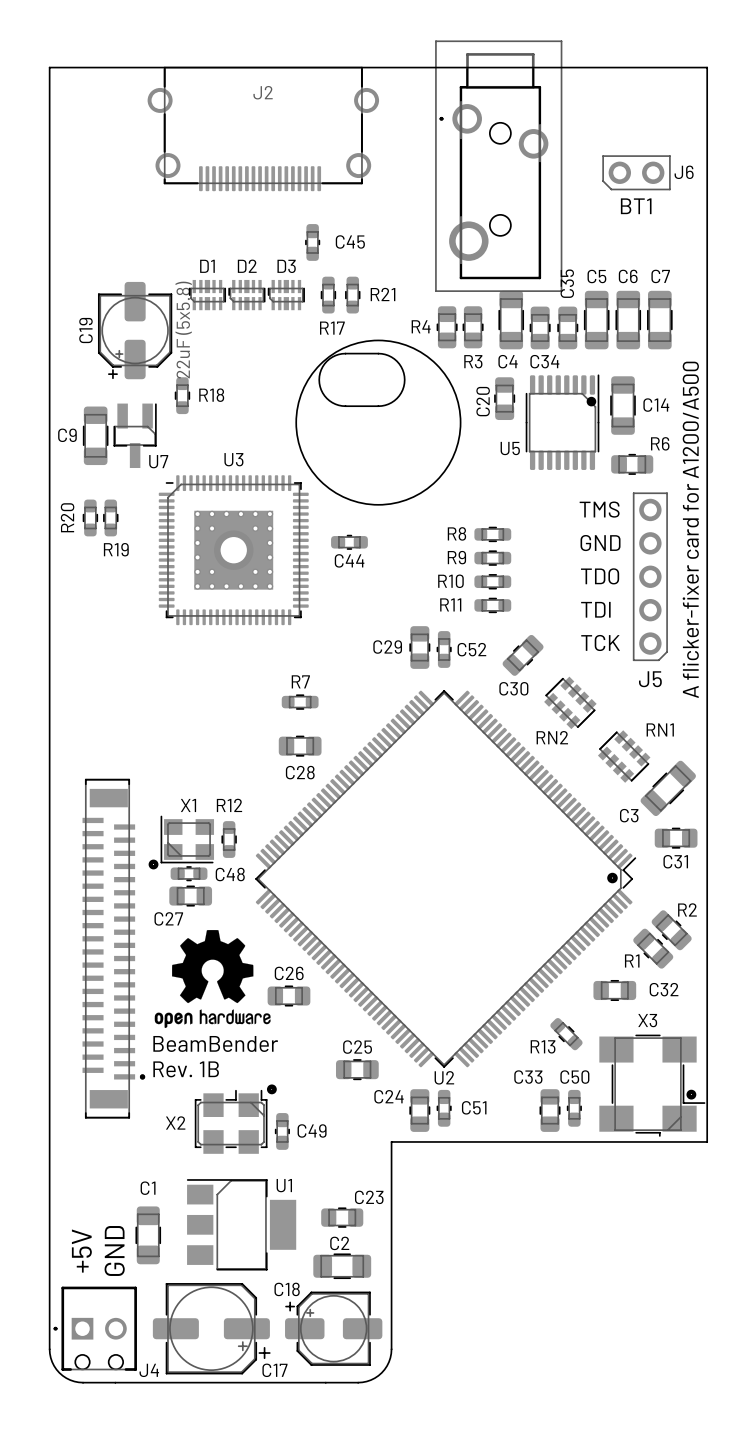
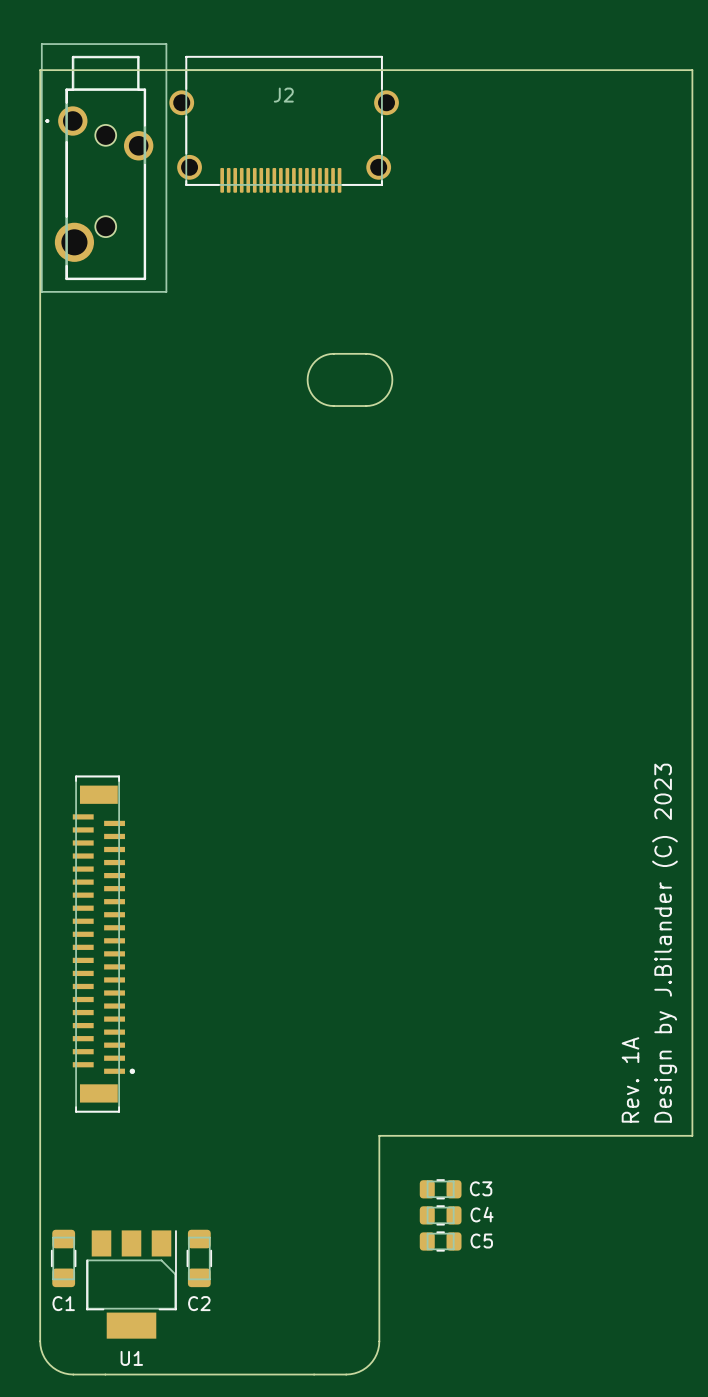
J2 footprint: [147, 67, 380, 192] -> [169, 55, 399, 193]
part: none -> (104, 167)
part: (498, 166) -> none
J6: (636, 172) -> none
text: BT1 (636, 206) -> none
C45: (312, 242) -> none
C5 name position: C5 (596, 276) -> C5 (481, 1241)
C4 footprint: [498, 290, 524, 350] -> [419, 1205, 462, 1226]
C5 footprint: [583, 290, 610, 350] -> [419, 1231, 462, 1252]
D1: (207, 295) -> none
D2: (246, 295) -> none
D3: (286, 295) -> none
R17: (328, 295) -> none
R21: (352, 295) -> none
C6: (628, 320) -> none
C7: (659, 320) -> none
R4: (447, 327) -> none
R3: (473, 327) -> none
C34: (540, 327) -> none
C35: (567, 327) -> none
C19: 22uF (5x5.8) (135, 330) -> none
drawing: [295, 339, 462, 506] -> none
C4 name position: C4 (508, 361) -> C4 (482, 1214)
R18: (182, 395) -> none
C20: (504, 398) -> none
C14: (623, 405) -> none
U5: (562, 422) -> none
C9: (95, 435) -> none
U7: (135, 435) -> none
R6: (632, 464) -> none
text: TMS (599, 509) -> none
R20: (90, 517) -> none
R19: (110, 517) -> none
text: A flicker-fixer card for A1200/A500 (690, 529) -> none
R8: (492, 534) -> none
C44: (349, 542) -> none
text: GND (600, 543) -> none
U3: (233, 550) -> none
R9: (492, 558) -> none
text: TDO (600, 576) -> none
J5: (650, 576) -> none
R10: (492, 581) -> none
R11: (492, 605) -> none
text: TDI (595, 609) -> none
text: TCK (600, 642) -> none
C29: (419, 647) -> none
C52: (444, 649) -> none
C30: (523, 655) -> none
R7: (300, 702) -> none
RN2: (570, 702) -> none
C28: (300, 746) -> none
RN1: (624, 756) -> none
C3 footprint: [640, 760, 696, 817] -> [419, 1179, 462, 1200]
C3 name position: C3 (629, 815) -> C3 (481, 1188)
C31: (676, 838) -> none
R12: (229, 839) -> none
X1: (181, 842) -> none
C48: (189, 873) -> none
U2: (445, 878) -> none
C27: (190, 896) -> none
drawing: [154, 930, 271, 1029] -> none
R2: (671, 930) -> none
R1: (653, 948) -> none
C32: (614, 990) -> none
text: none -> Design by J.Bilander (C) 2023 (664, 943)
C26: (288, 996) -> none
R13: (566, 1034) -> none
text: BeamBender (215, 1043) -> none
text: Rev. 1B (186, 1069) -> none
C25: (357, 1069) -> none
X3: (652, 1085) -> none
text: none -> Rev. 1A (630, 1079)
C51: (444, 1108) -> none
C50: (574, 1108) -> none
C24: (419, 1110) -> none
C33: (550, 1110) -> none
X2: (235, 1119) -> none
C49: (282, 1131) -> none
U1 name position: U1 (284, 1185) -> U1 (131, 1358)
C1 name position: C1 (148, 1188) -> C1 (63, 1303)
C23: (342, 1217) -> none
U1 rotation: 0° (241, 1224) -> 90° clockwise (131, 1284)
U1 position: (241, 1224) -> (131, 1284)
C1 position: (148, 1235) -> (63, 1258)
C2 name position: C2 (339, 1243) -> C2 (199, 1303)
text: GND (114, 1250) -> none
text: +5V (81, 1251) -> none
C2 rotation: 0° (342, 1266) -> 90° clockwise (199, 1258)
C2 position: (342, 1266) -> (199, 1258)
J4: (95, 1328) -> none
C17: (211, 1328) -> none
C18: (333, 1328) -> none

